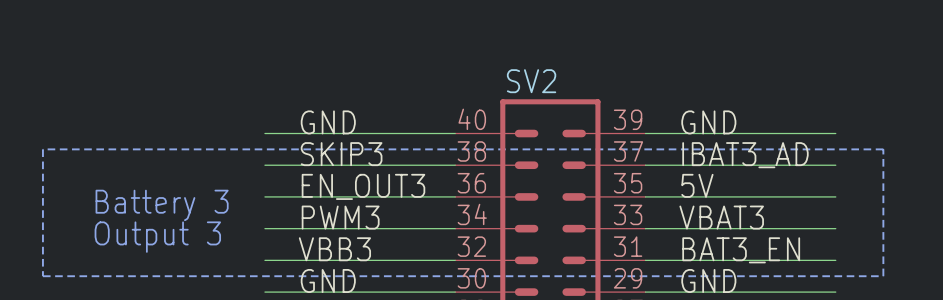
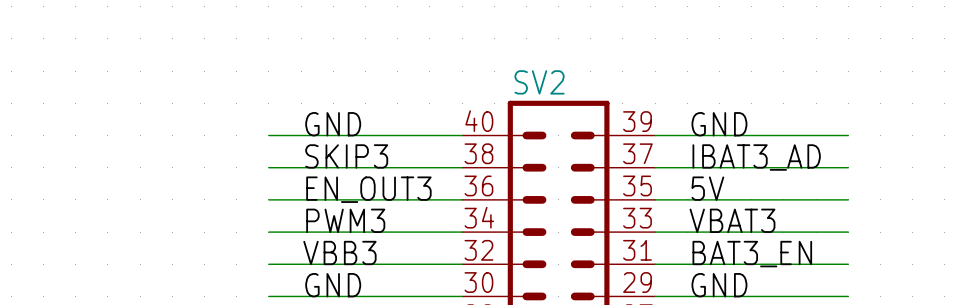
line: (42, 149) (883, 149) (883, 276) (42, 276) (42, 149) -> none
text: Battery 3 (162, 205) -> none
text: Output 3 (157, 237) -> none

